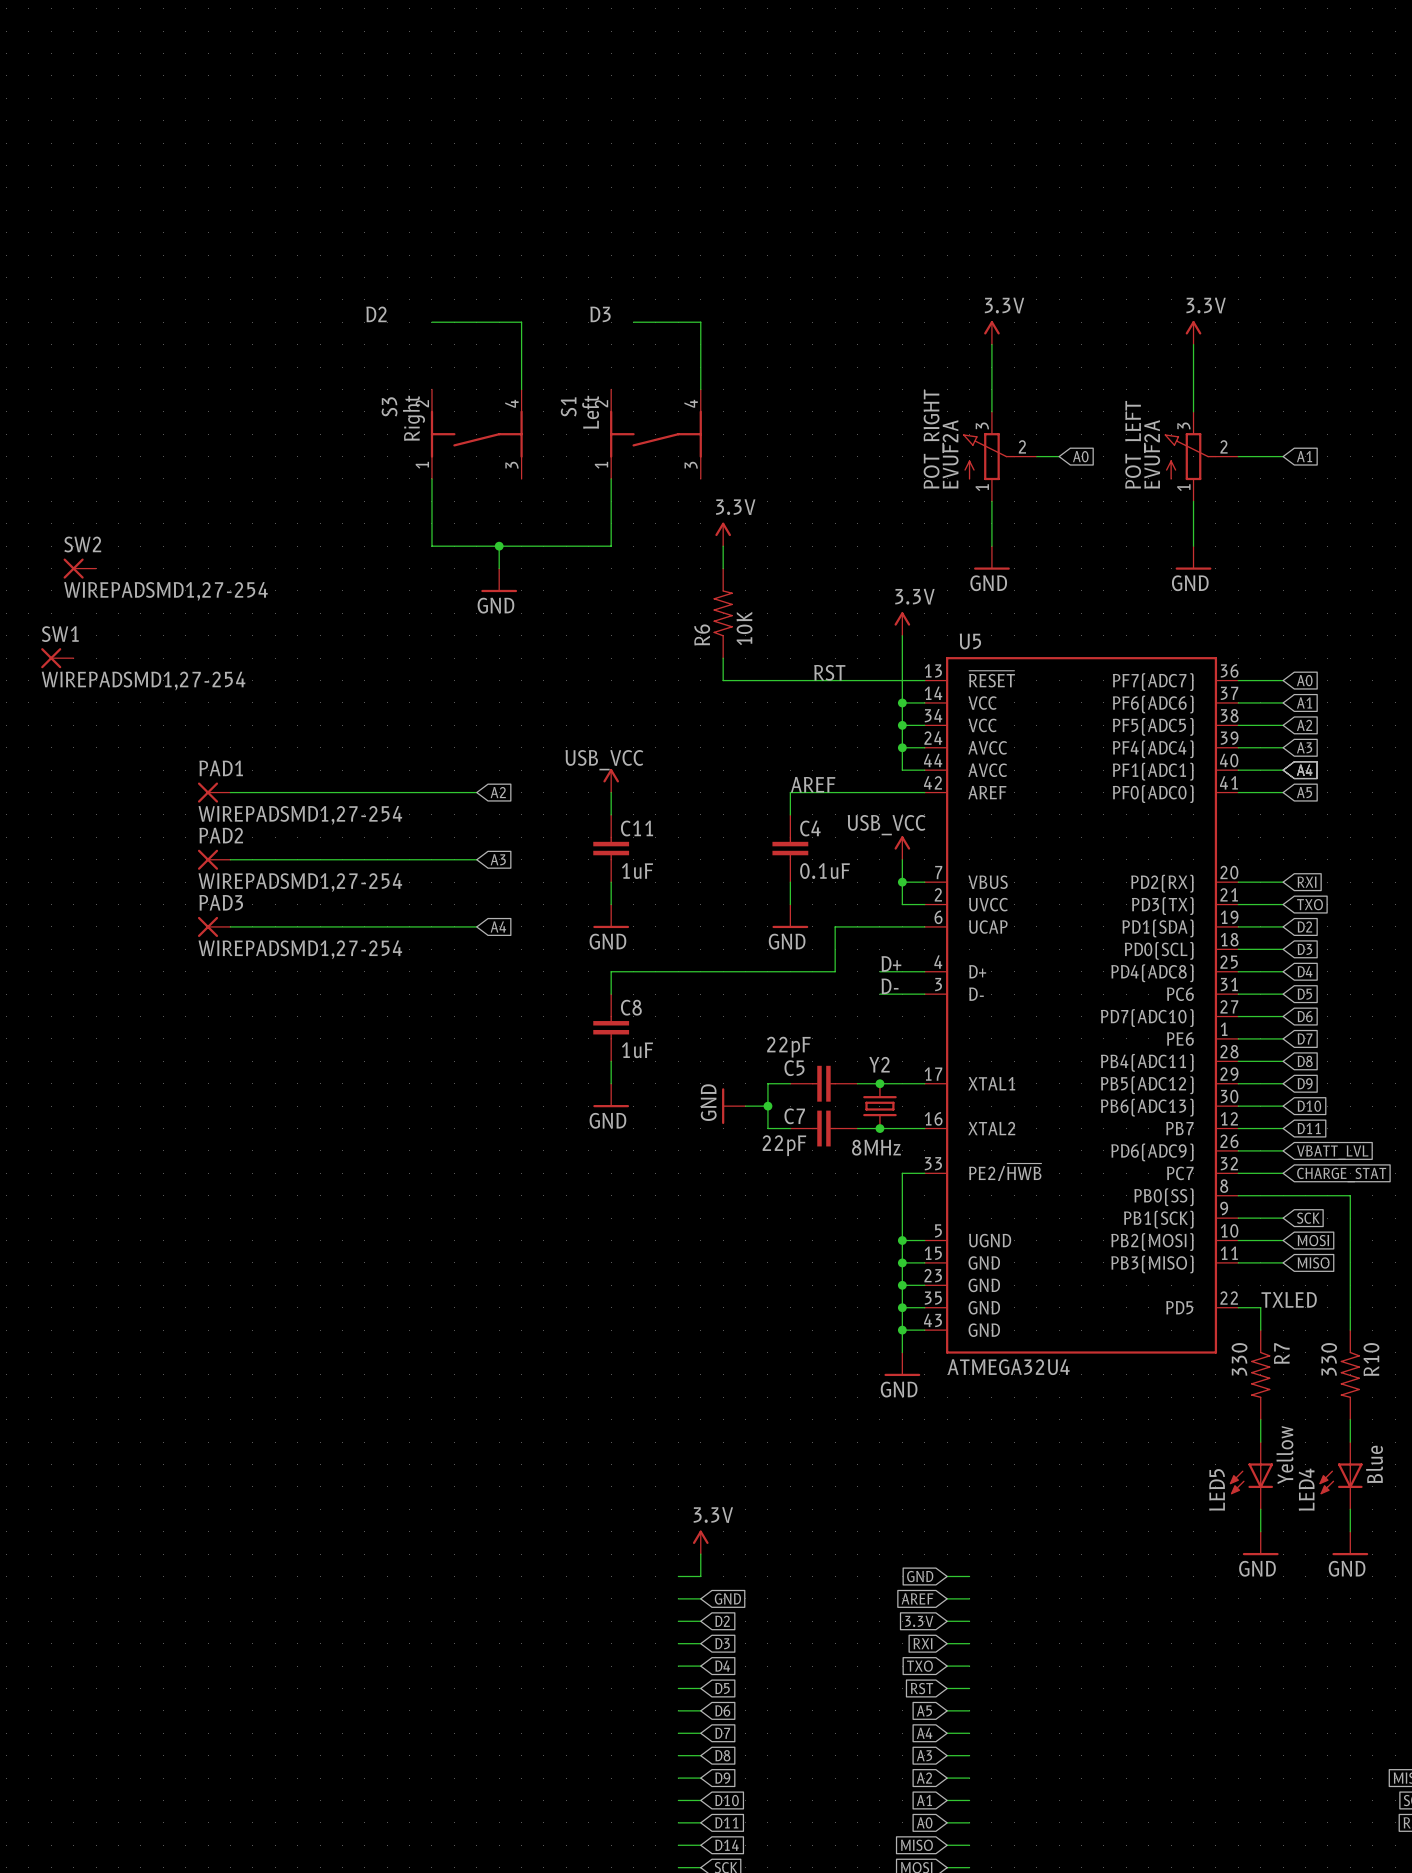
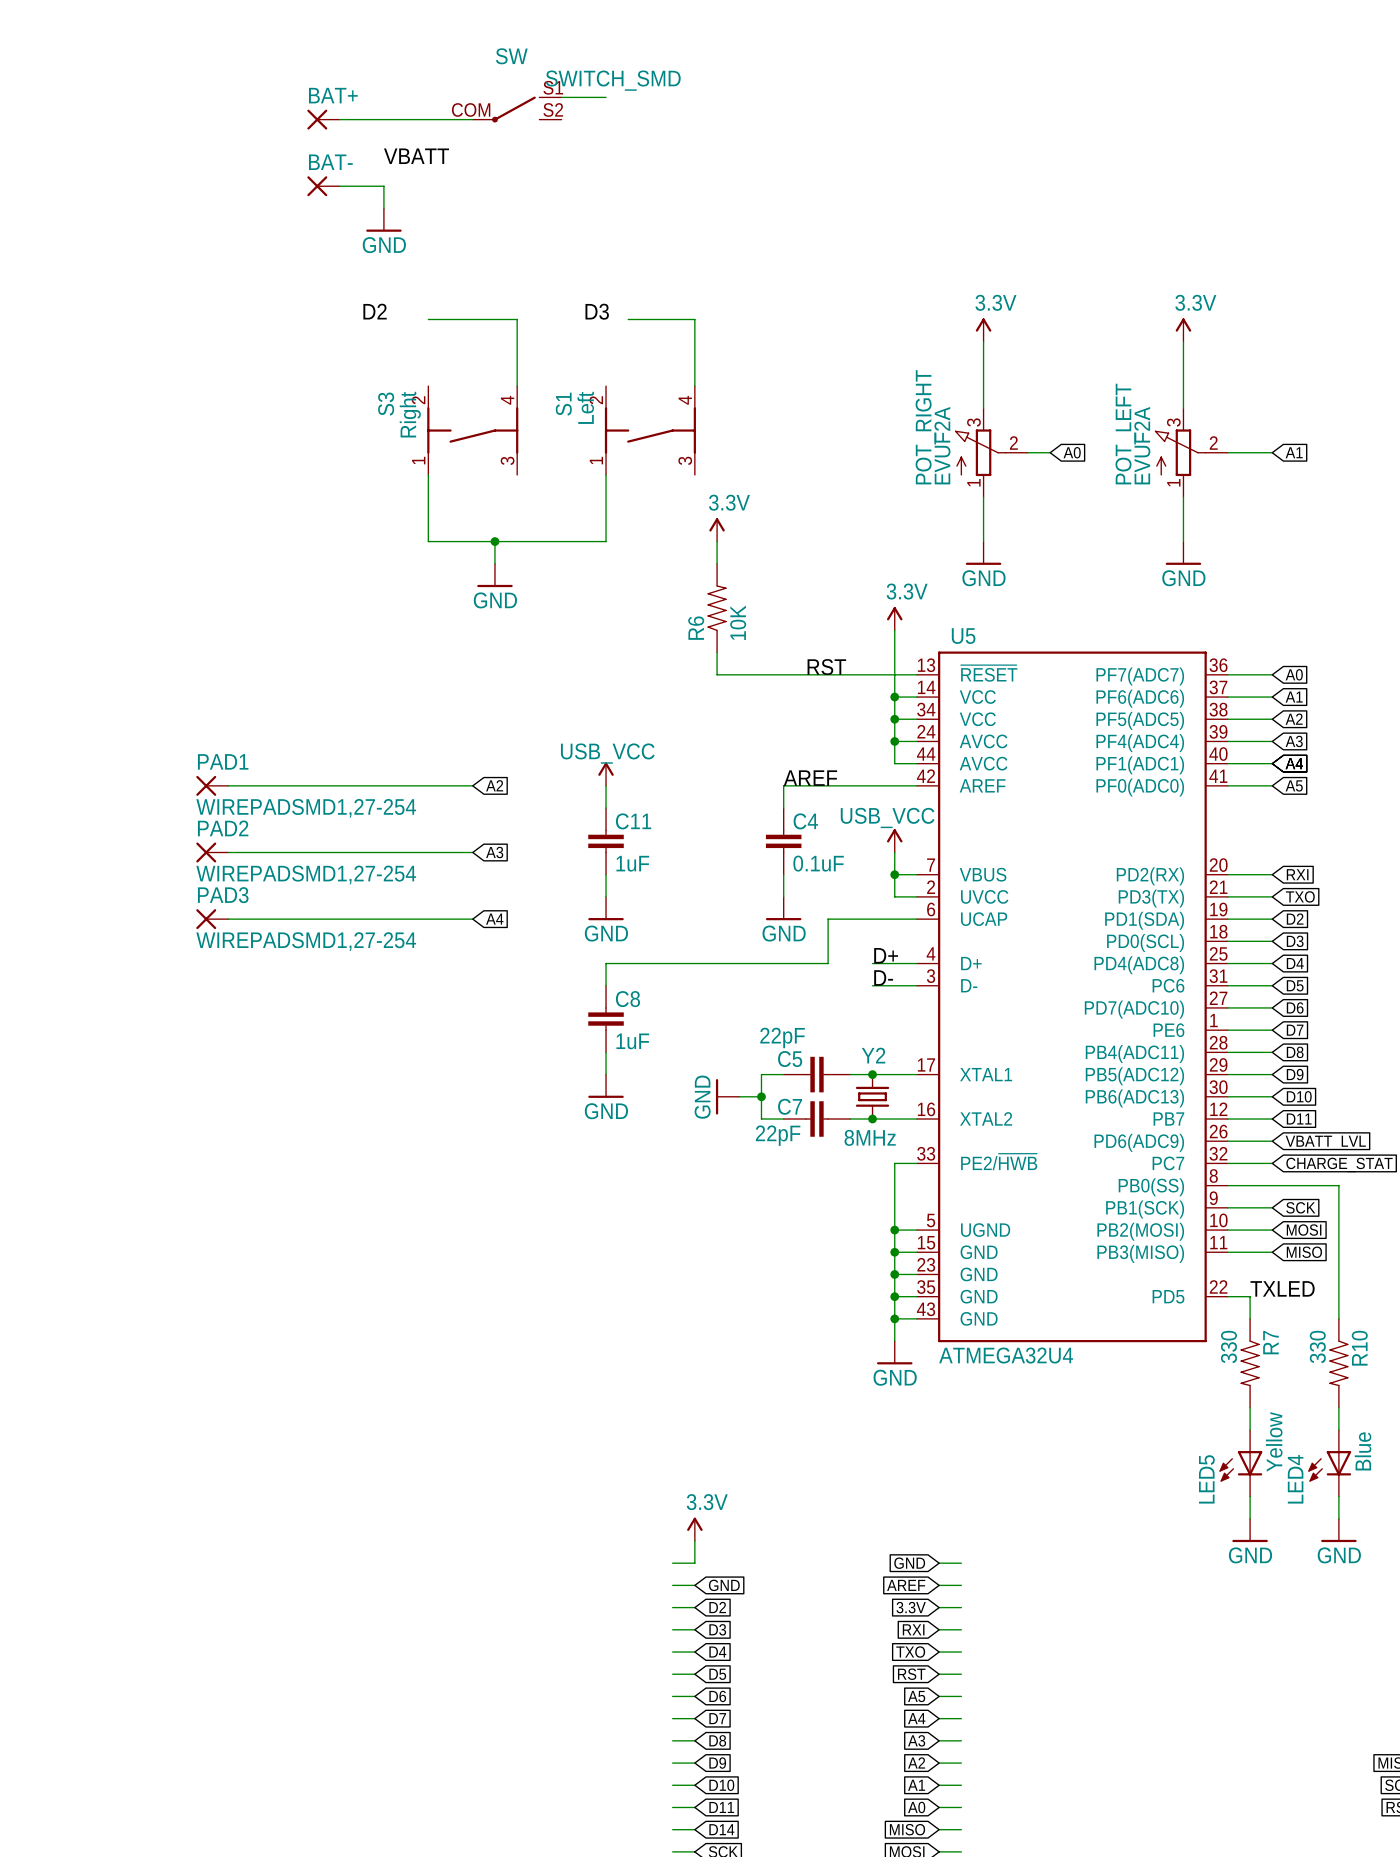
wire: none -> (561, 97) (606, 97)
SW: none -> SWITCH_SMD (517, 109)
BAT+: none -> (323, 119)
wire: none -> (339, 119) (472, 119)
label: none -> VBATT (416, 156)
BAT-: none -> (323, 186)
wire: none -> (339, 186) (383, 186) (383, 208)
power symbol: none -> GND (383, 220)
SW2: WIREPADSMD1,27-254 (79, 568) -> none
SW1: WIREPADSMD1,27-254 (57, 658) -> none

